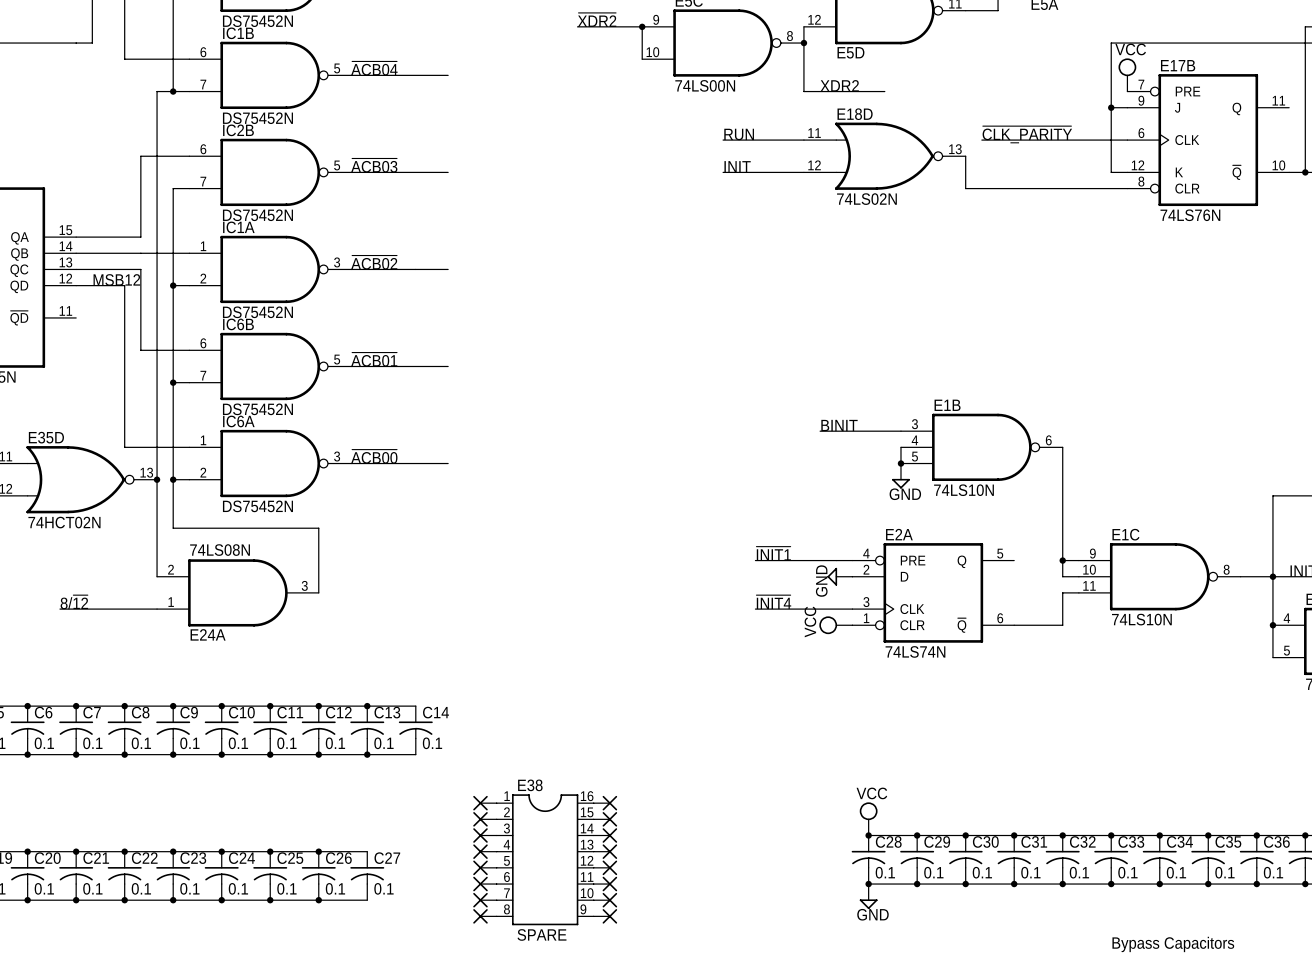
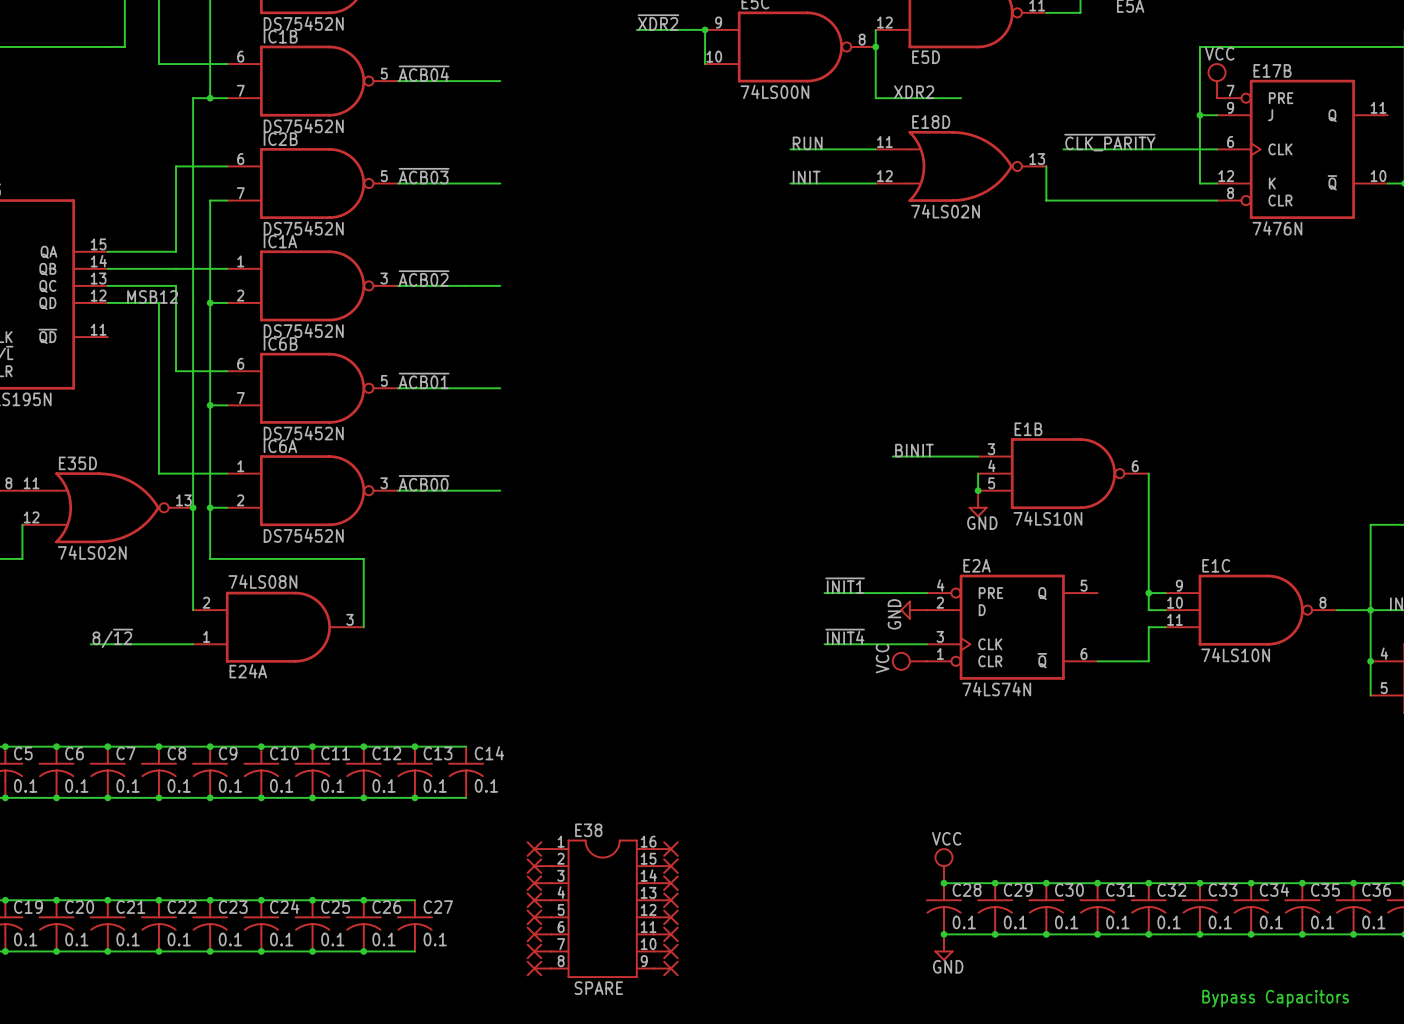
E17B value: 74LS76N (1190, 215) -> 7476N (1277, 228)
E35D value: 74HCT02N (64, 522) -> 74LS02N (92, 552)

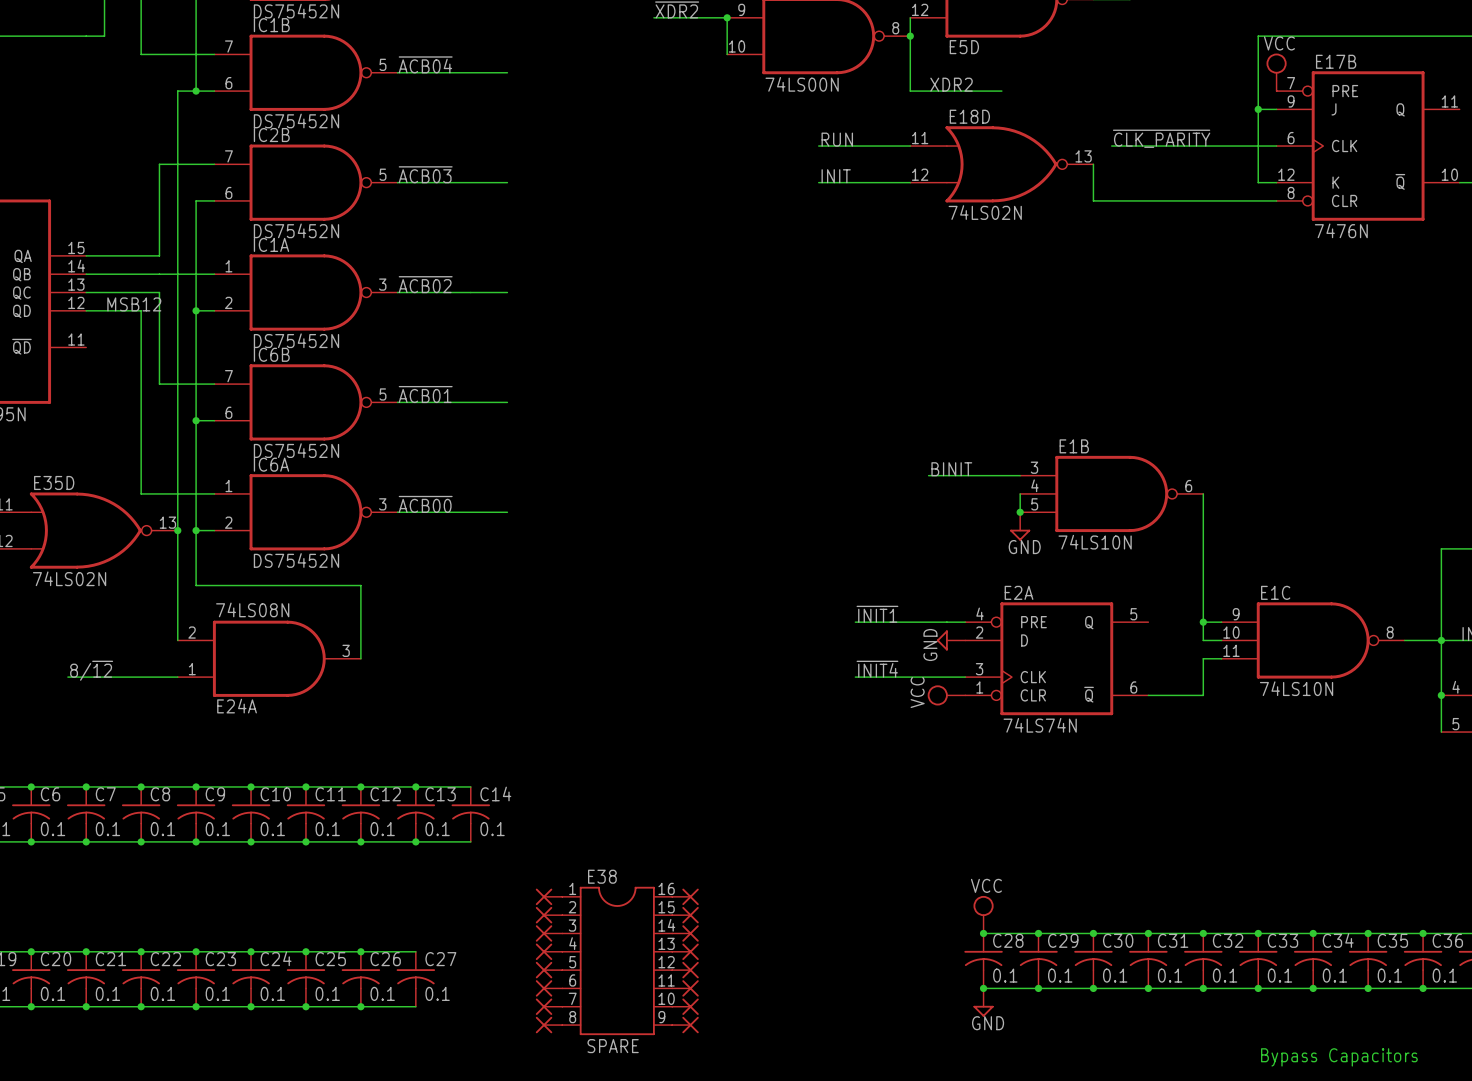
IC1B flip: as is (312, 81) -> up-down (305, 72)
IC2B flip: as is (312, 183) -> up-down (305, 182)
IC6B flip: as is (312, 388) -> up-down (305, 402)

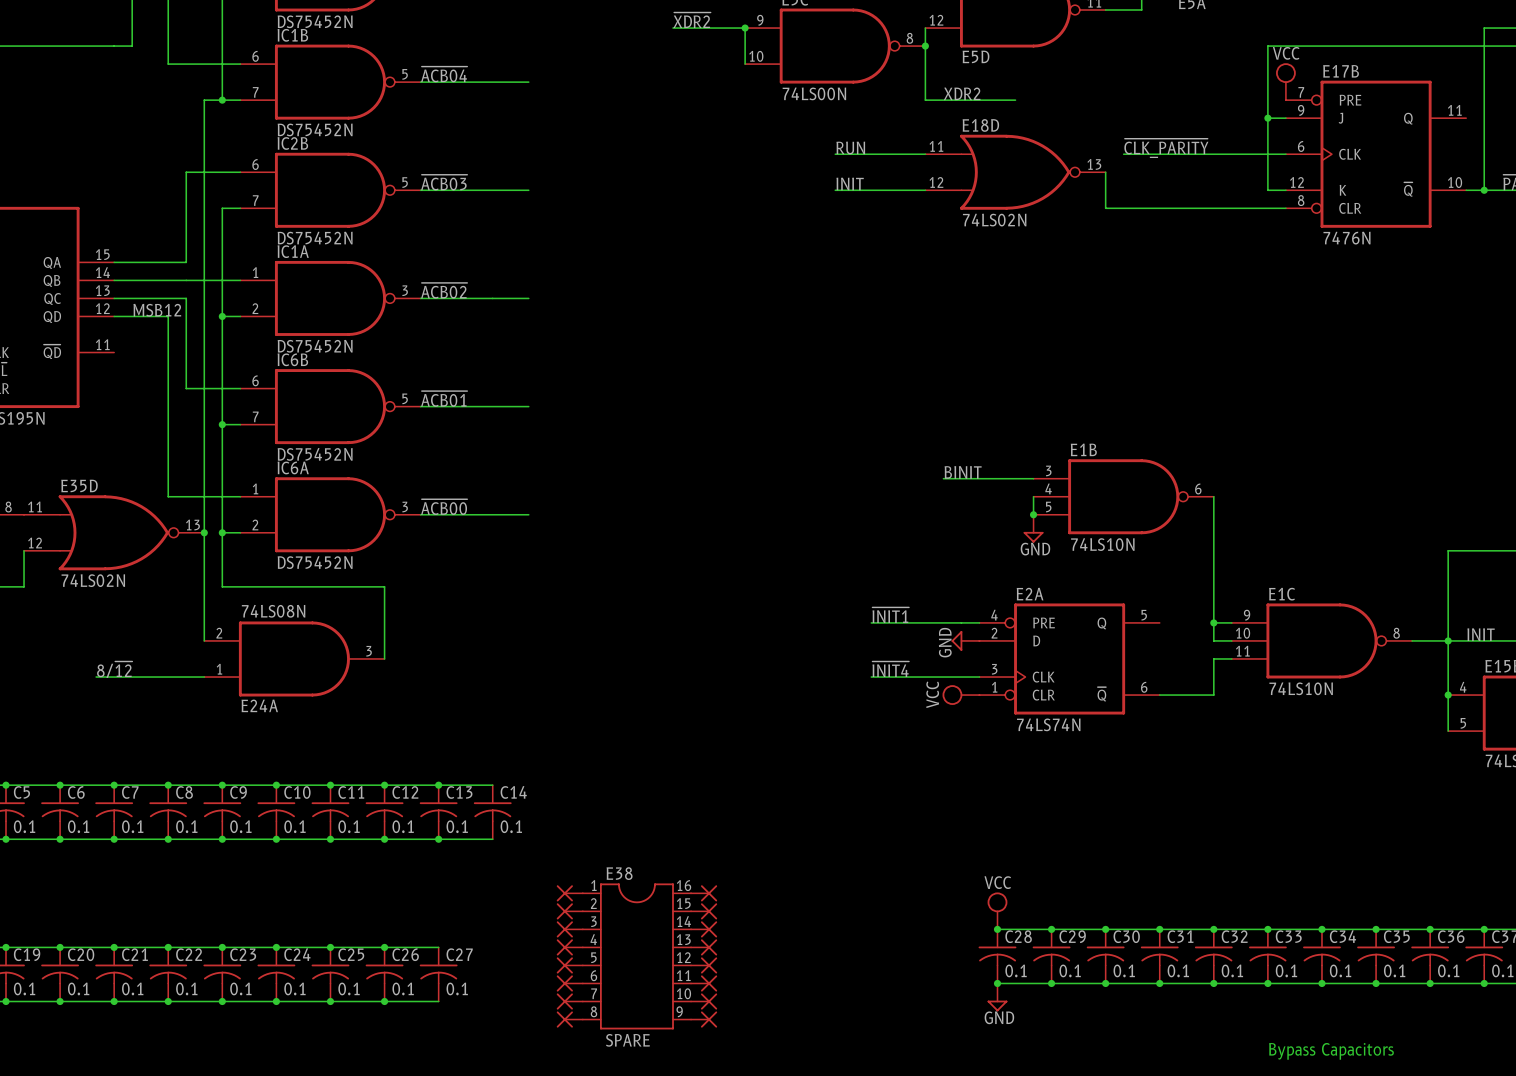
IC1B flip: as is (305, 72) -> up-down (330, 82)
IC2B flip: as is (305, 182) -> up-down (330, 190)
IC6B flip: as is (305, 402) -> up-down (330, 406)

